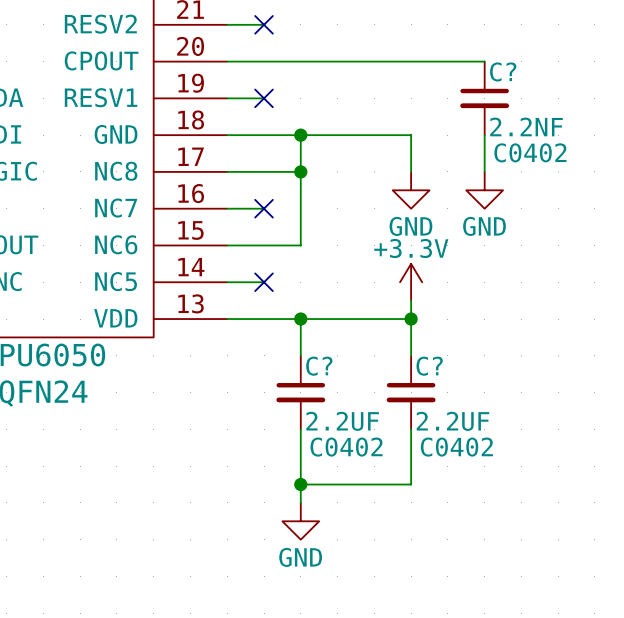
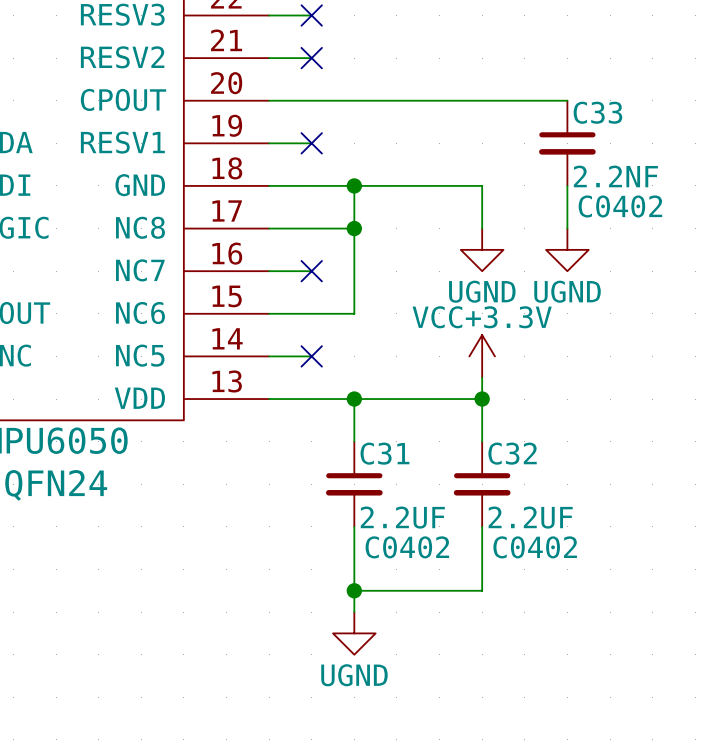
C? name: C? (503, 71) -> C33 (597, 112)
power symbol: GND (411, 190) -> UGND (482, 249)
power symbol: GND (484, 190) -> UGND (567, 249)
power symbol: +3.3V (411, 282) -> VCC+3.3V (482, 356)
C? name: C? (319, 366) -> C31 (384, 453)
C? name: C? (429, 366) -> C32 (512, 453)
power symbol: GND (300, 521) -> UGND (354, 633)

